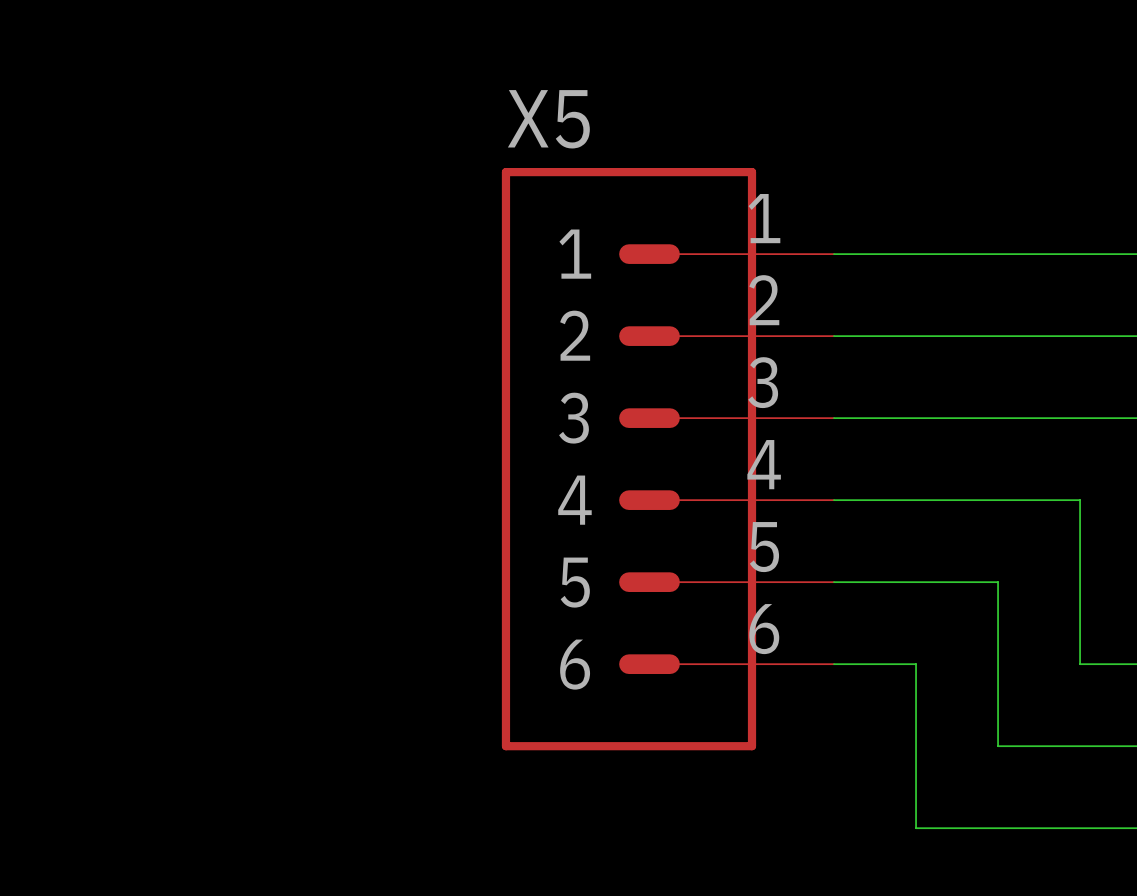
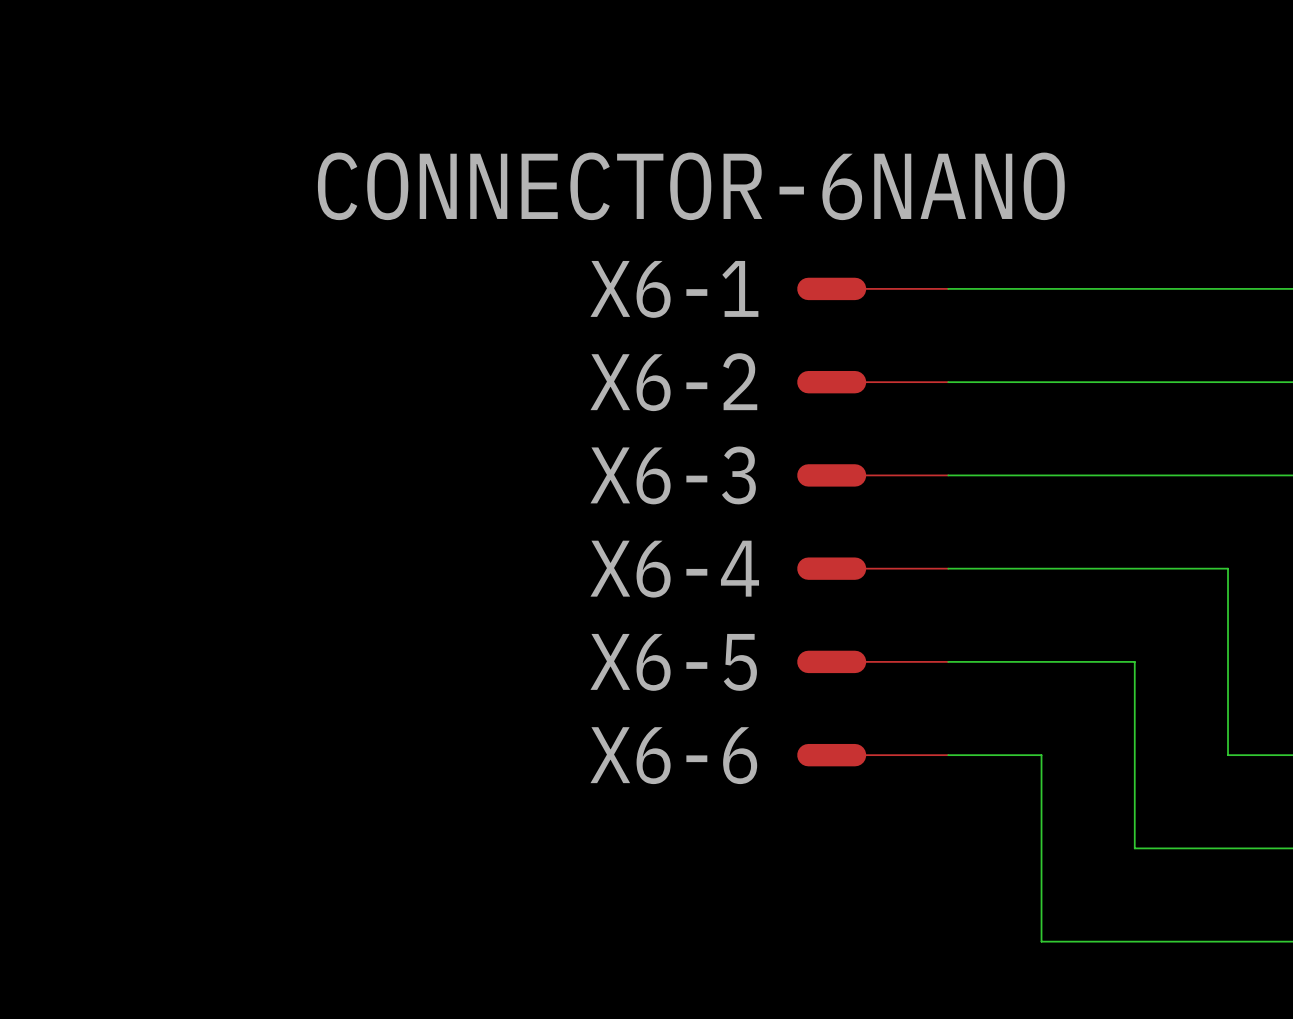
X6-1: none -> CONNECTOR-6NANO (872, 288)
X6-2: none -> (872, 382)
X6-3: none -> (872, 475)
X5: (667, 459) -> none
X6-4: none -> (872, 568)
X6-5: none -> (872, 661)
X6-6: none -> (872, 755)

